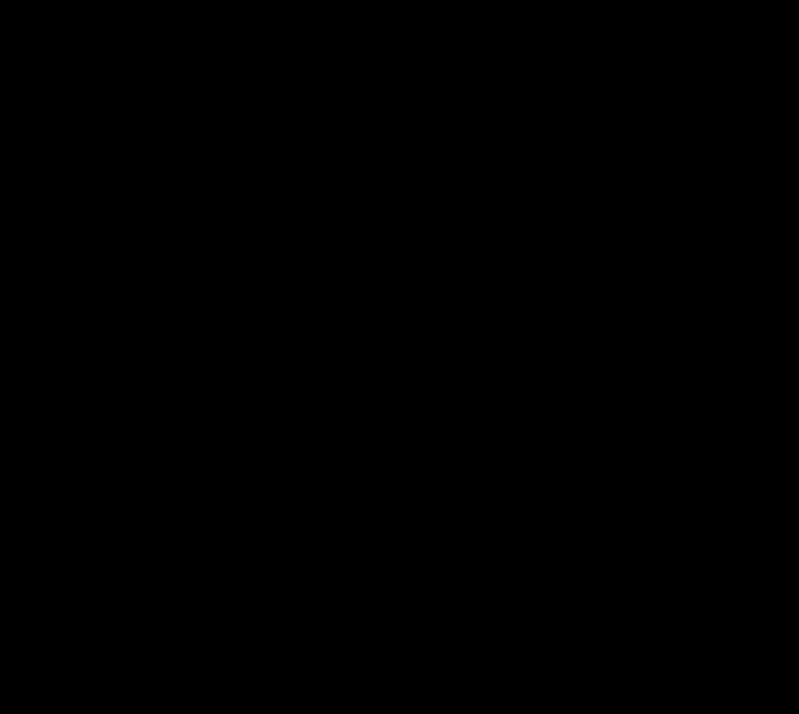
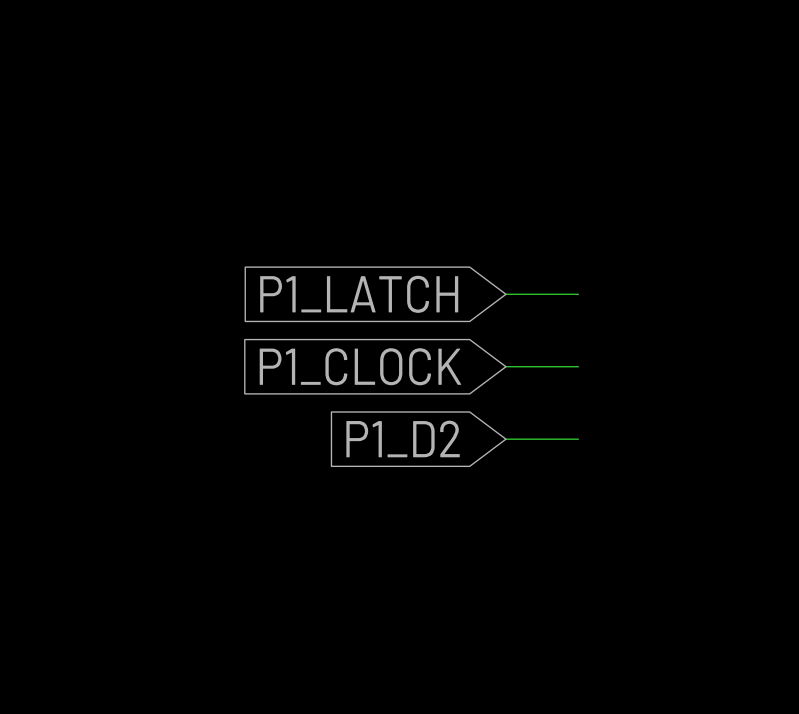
global label: none -> P1_LATCH (359, 294)
wire: none -> (505, 294) (578, 294)
global label: none -> P1_CLOCK (360, 366)
wire: none -> (505, 366) (578, 366)
global label: none -> P1_D2 (403, 438)
wire: none -> (505, 439) (578, 439)

